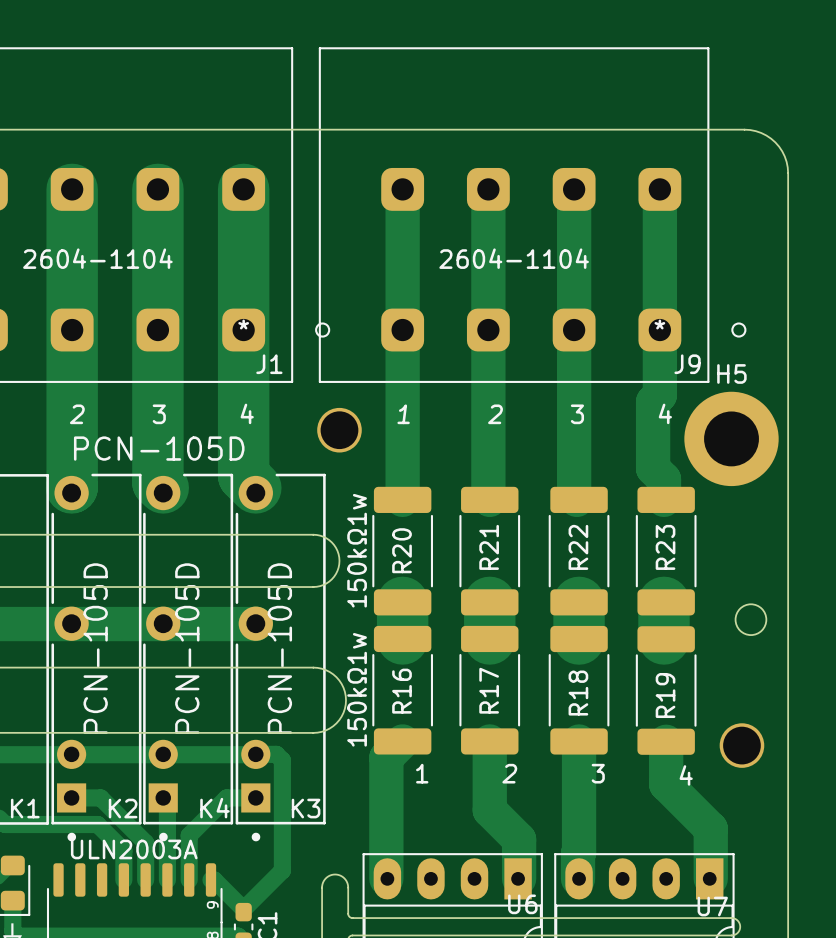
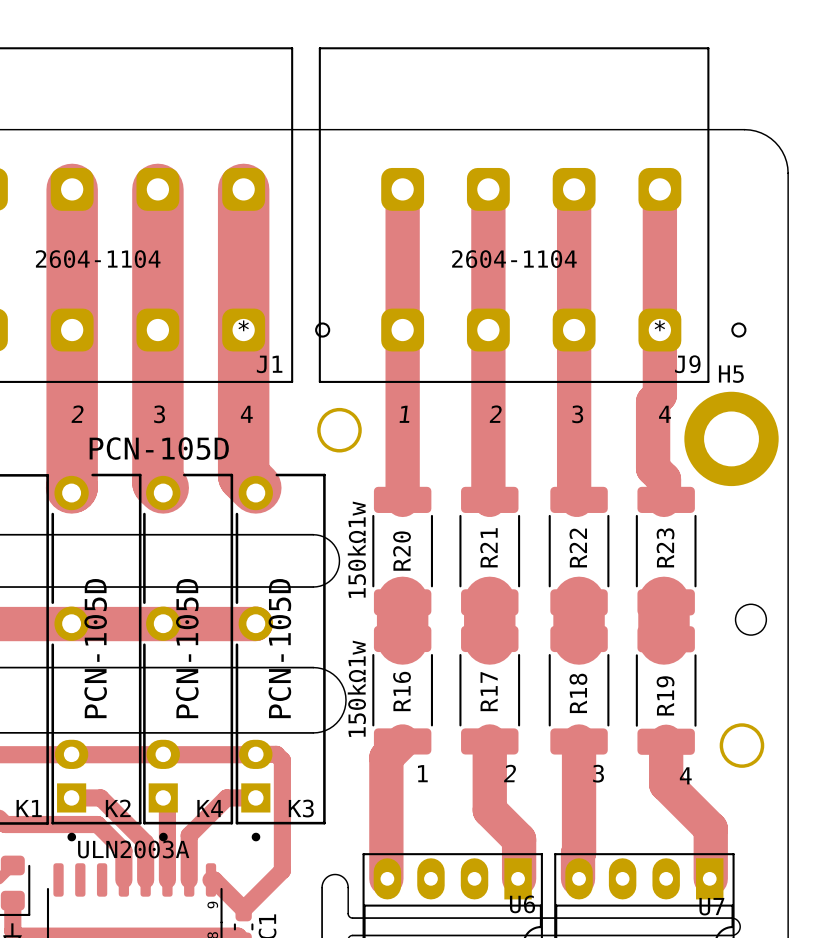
K2 footprint: [51, 473, 142, 842] -> [51, 473, 142, 842]
K4 footprint: [143, 473, 234, 842] -> [143, 473, 234, 842]
K3 footprint: [235, 473, 326, 842] -> [235, 473, 326, 842]

